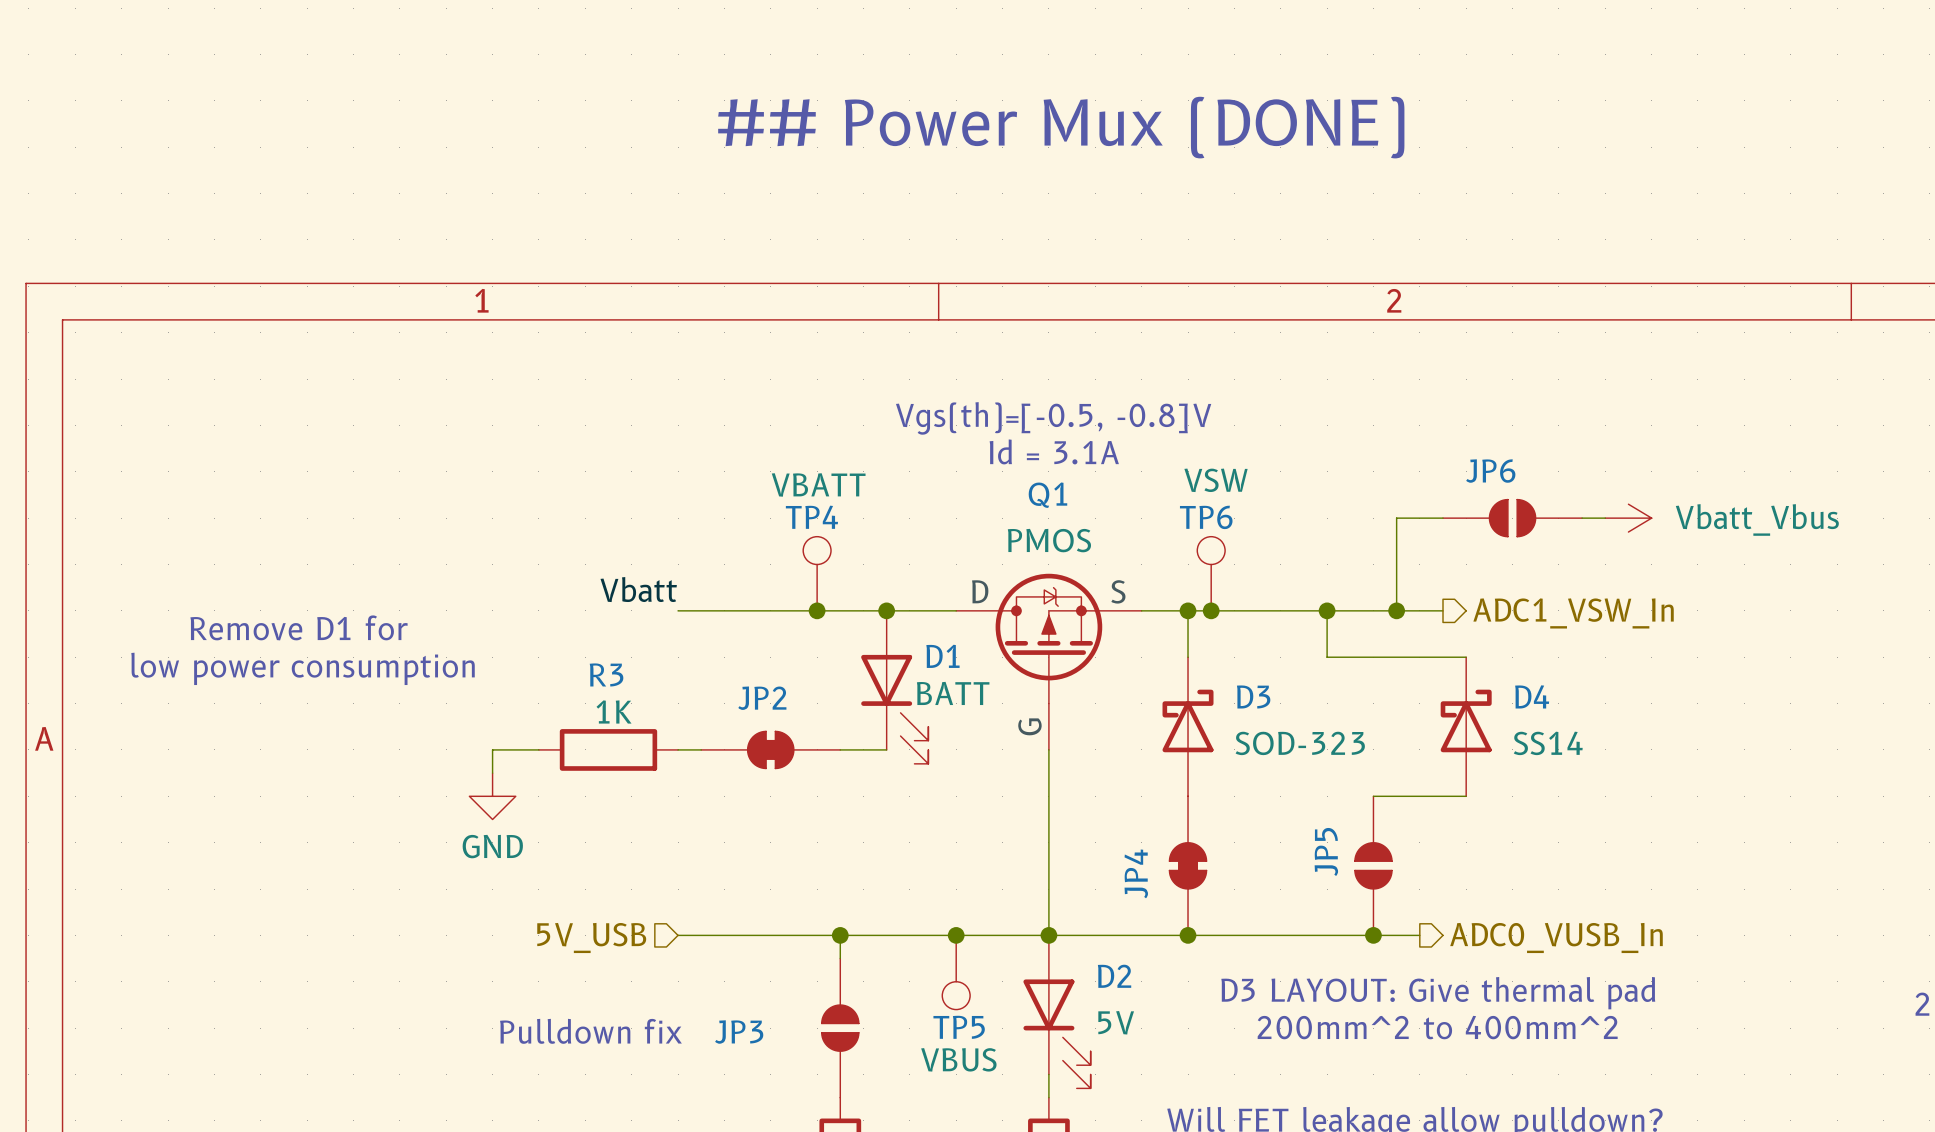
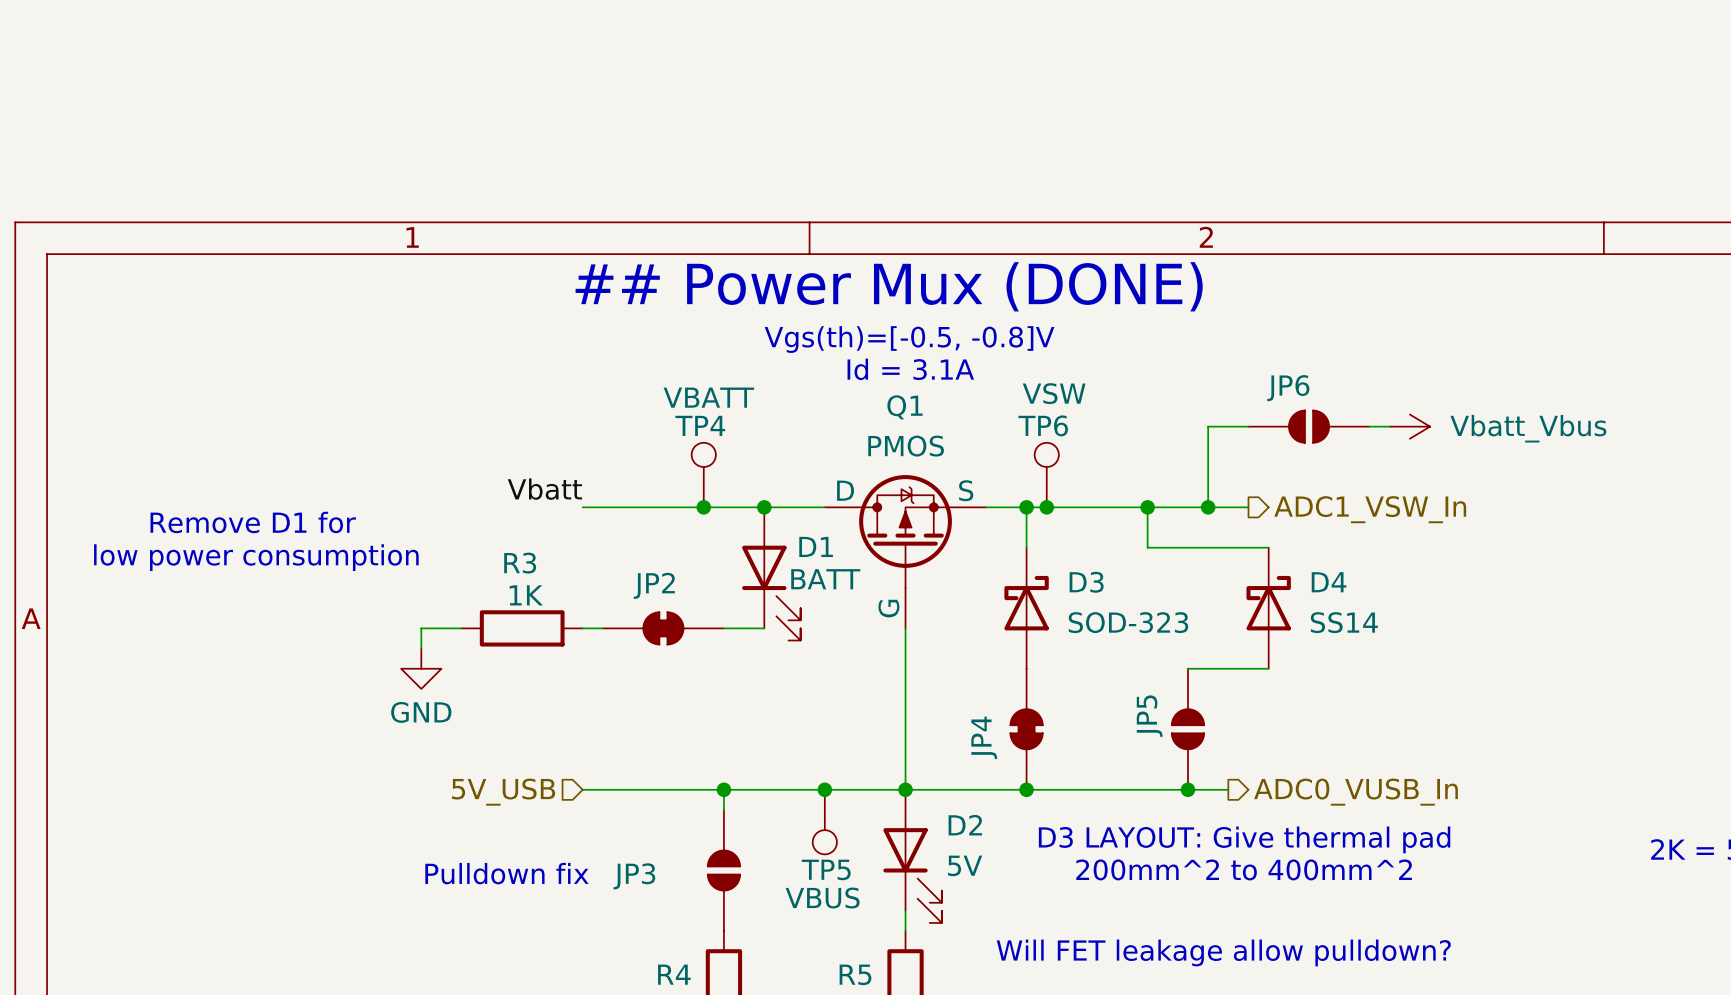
text position: ## Power Mux (DONE) (1061, 127) -> ## Power Mux (DONE) (889, 286)

